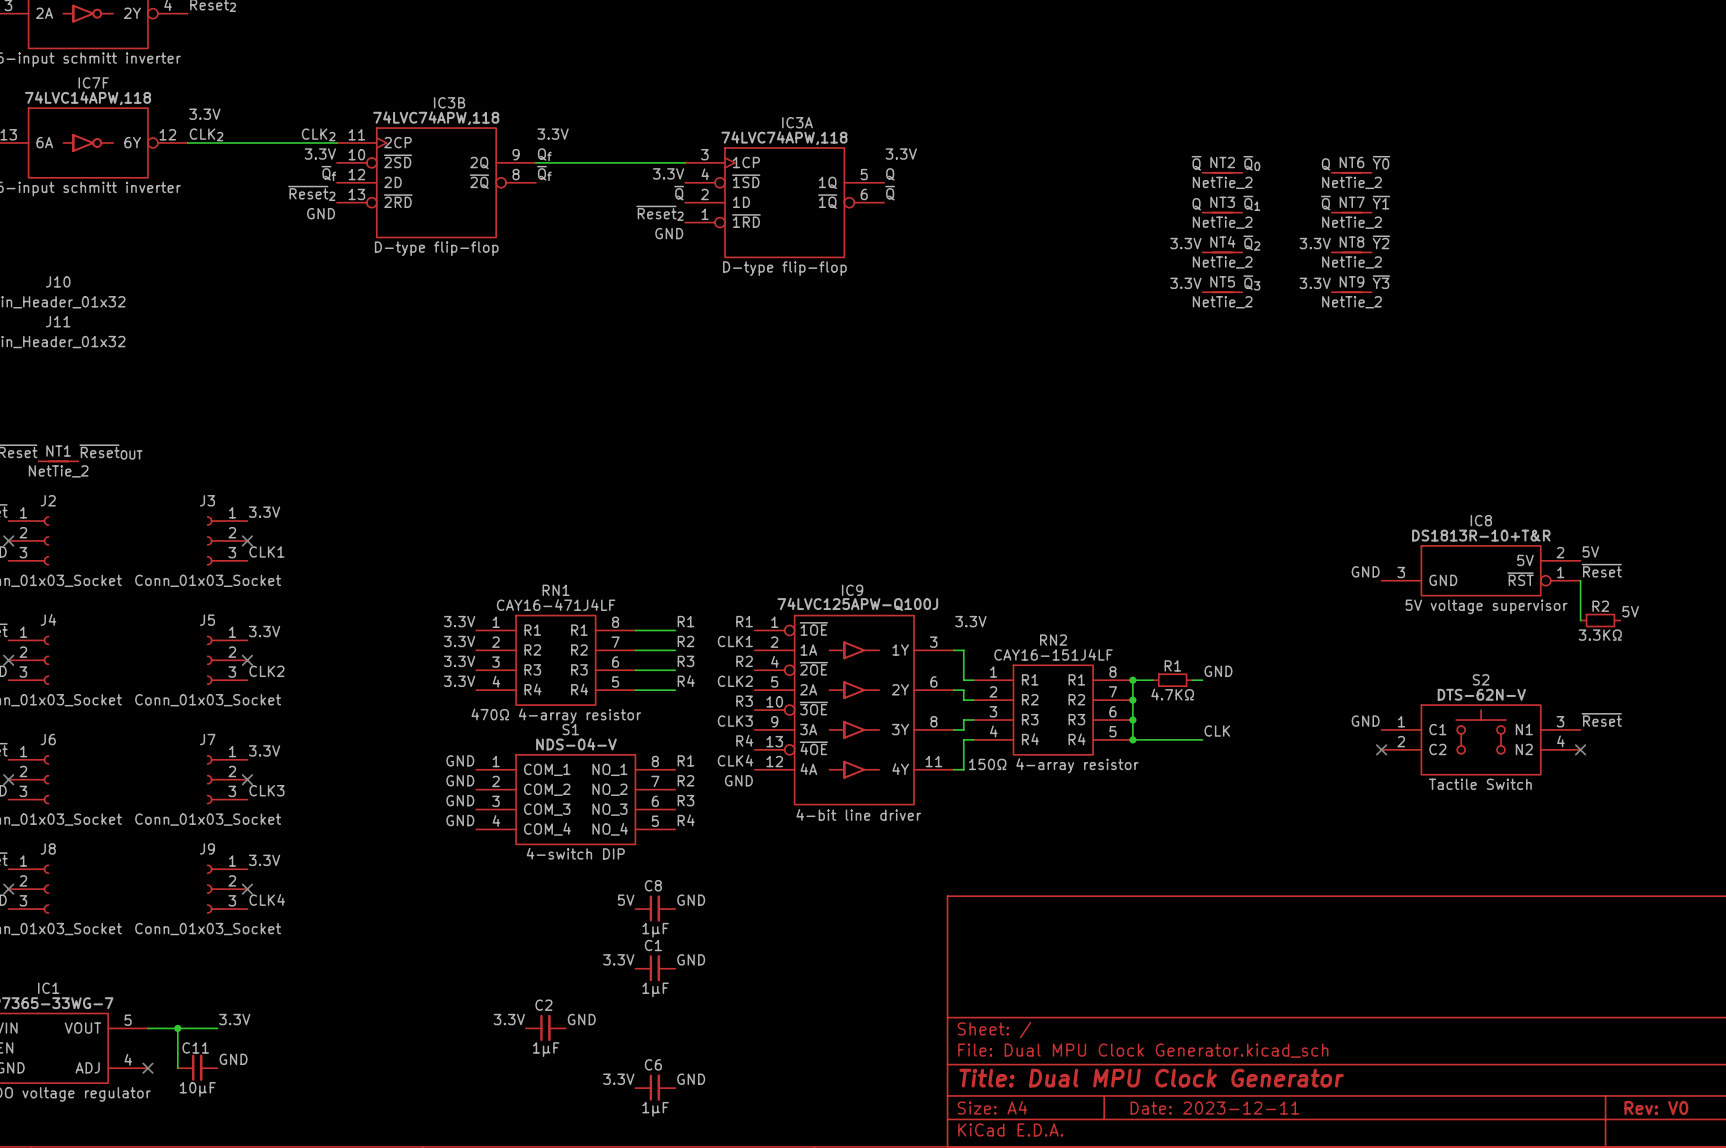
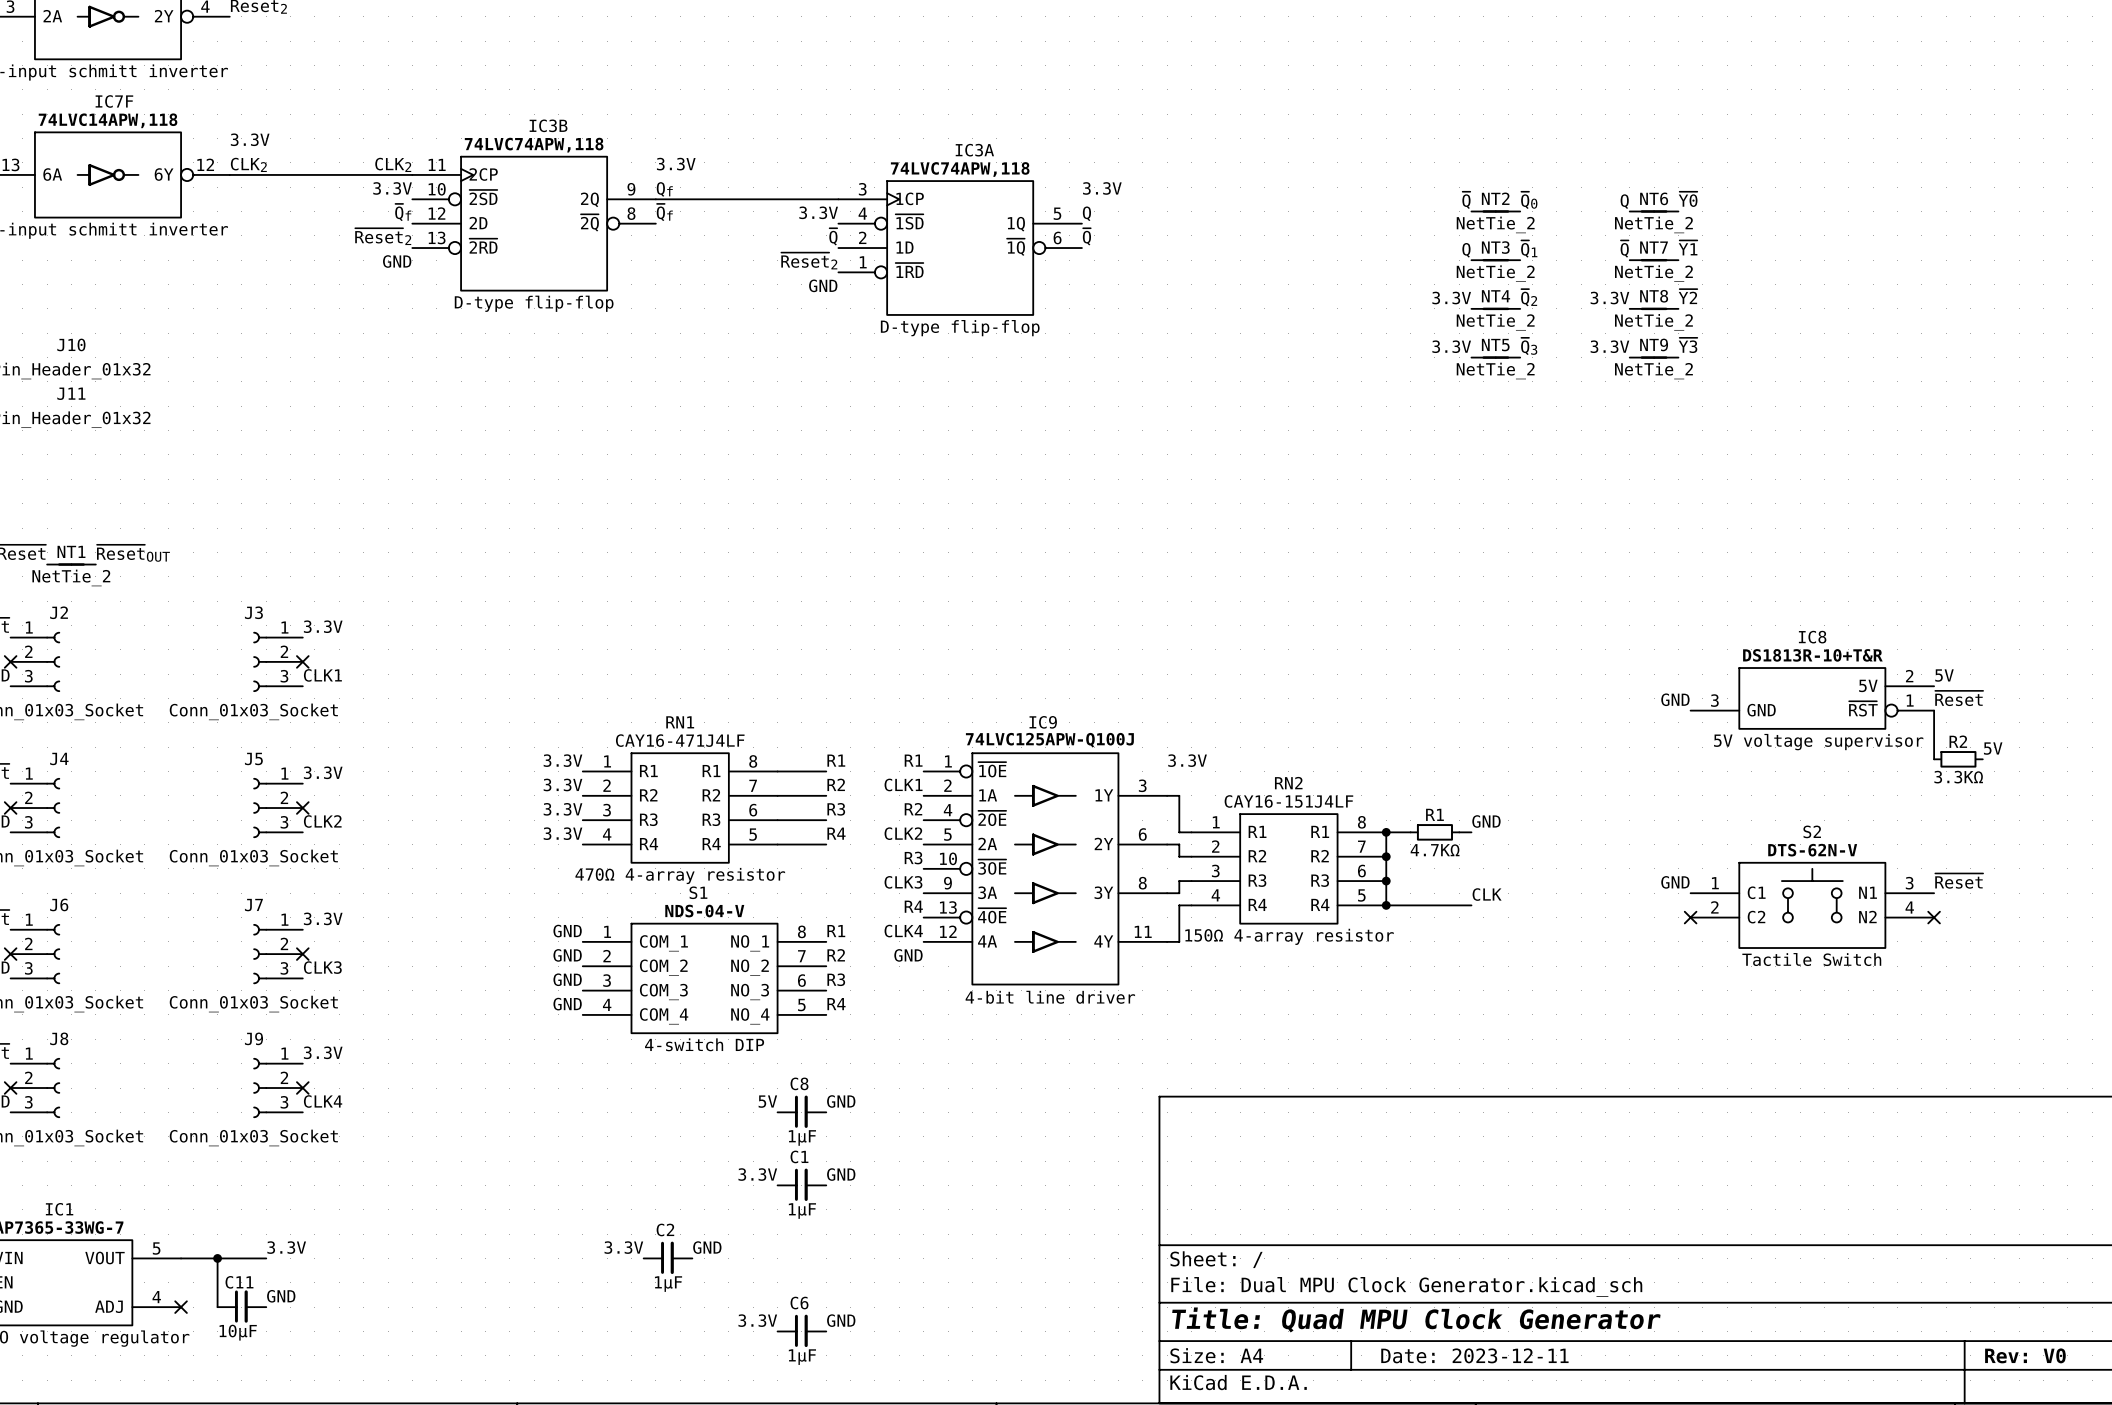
title block: Title: Dual MPU Clock Generator (1151, 1078) -> Title: Quad MPU Clock Generator (1416, 1319)

